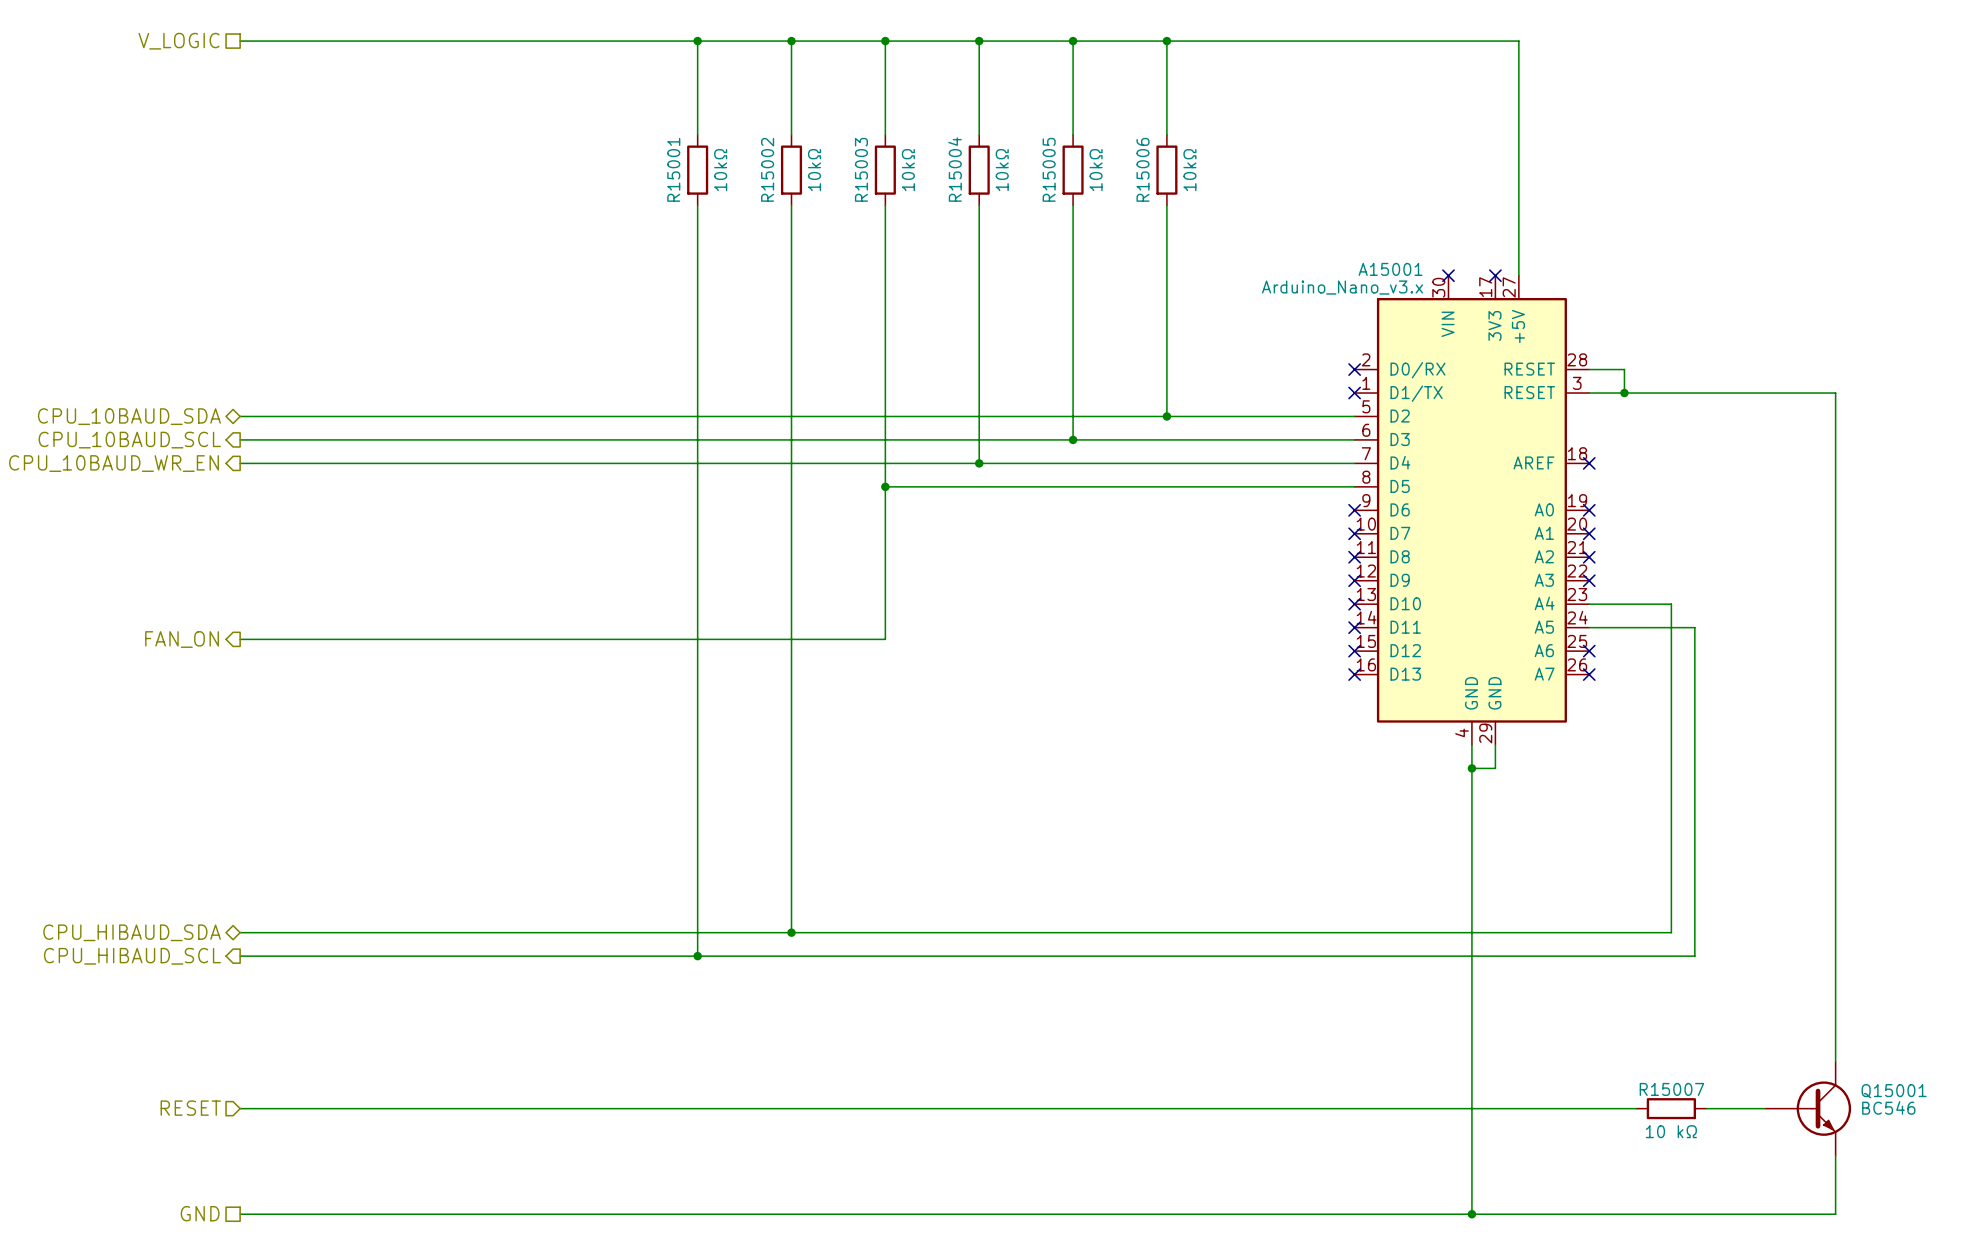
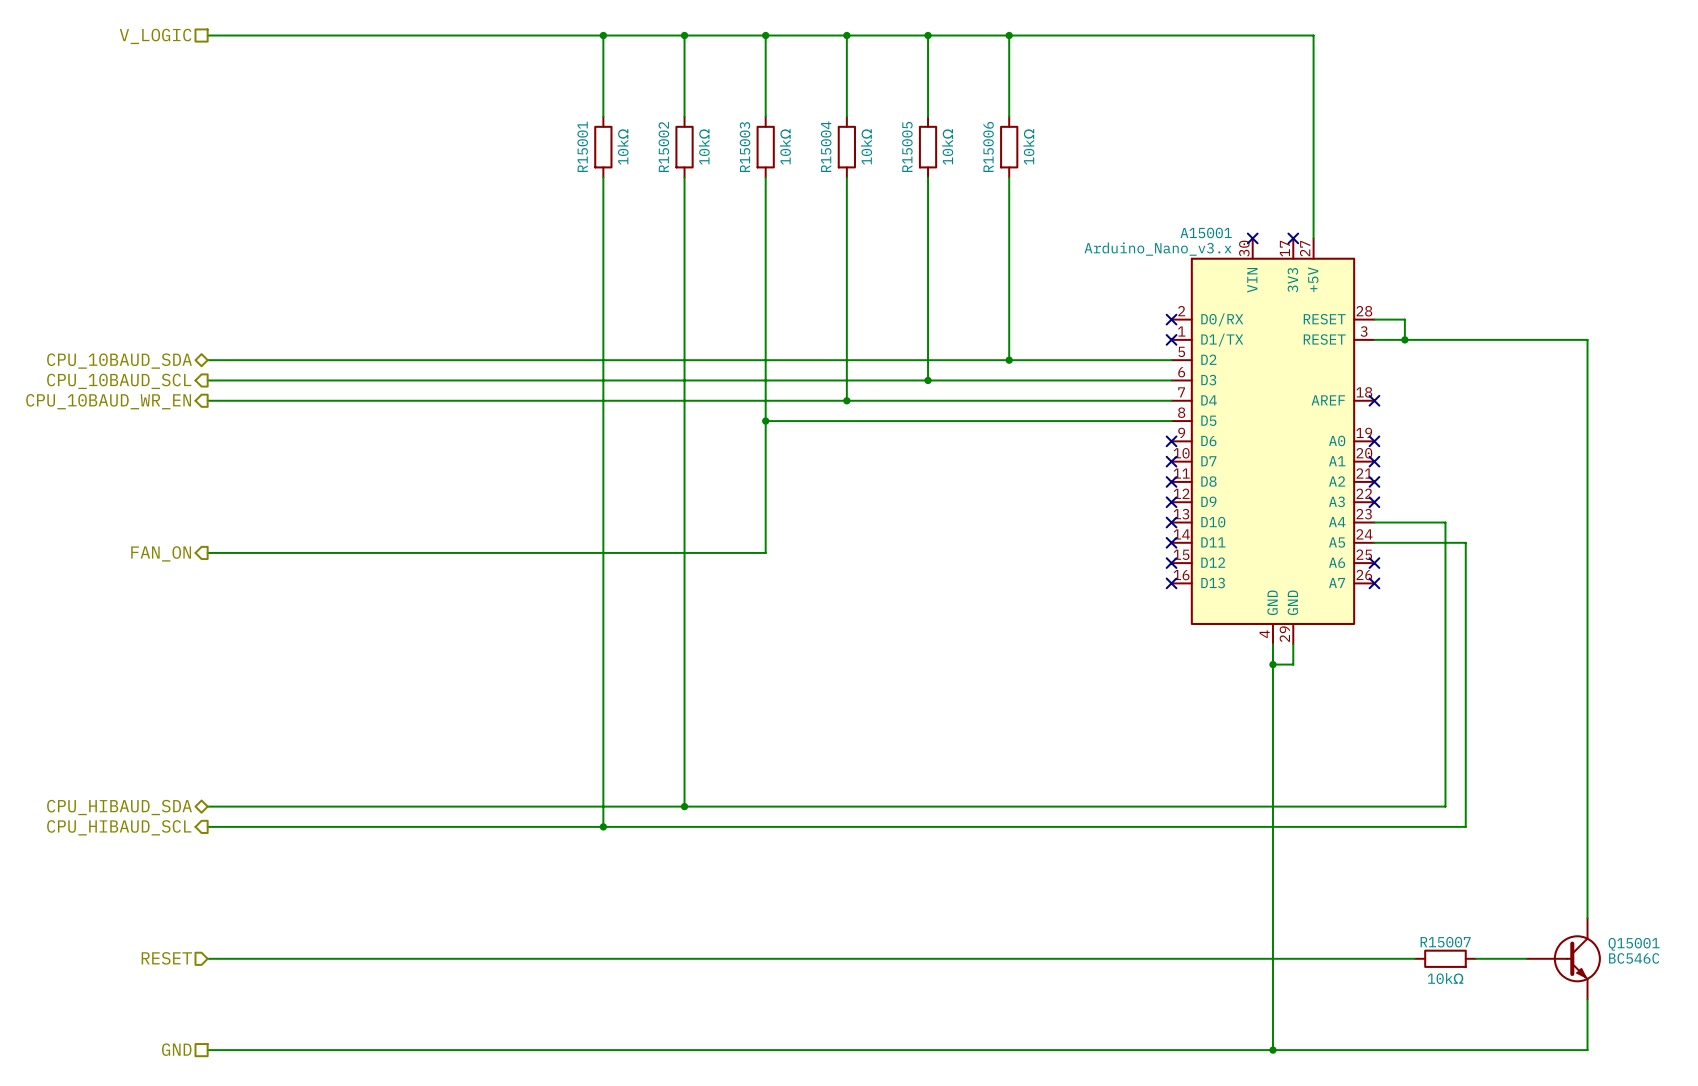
Q15001 value: BC546 (1888, 1107) -> BC546C (1634, 958)
R15007 value: 10 kΩ (1671, 1131) -> 10kΩ (1445, 978)

